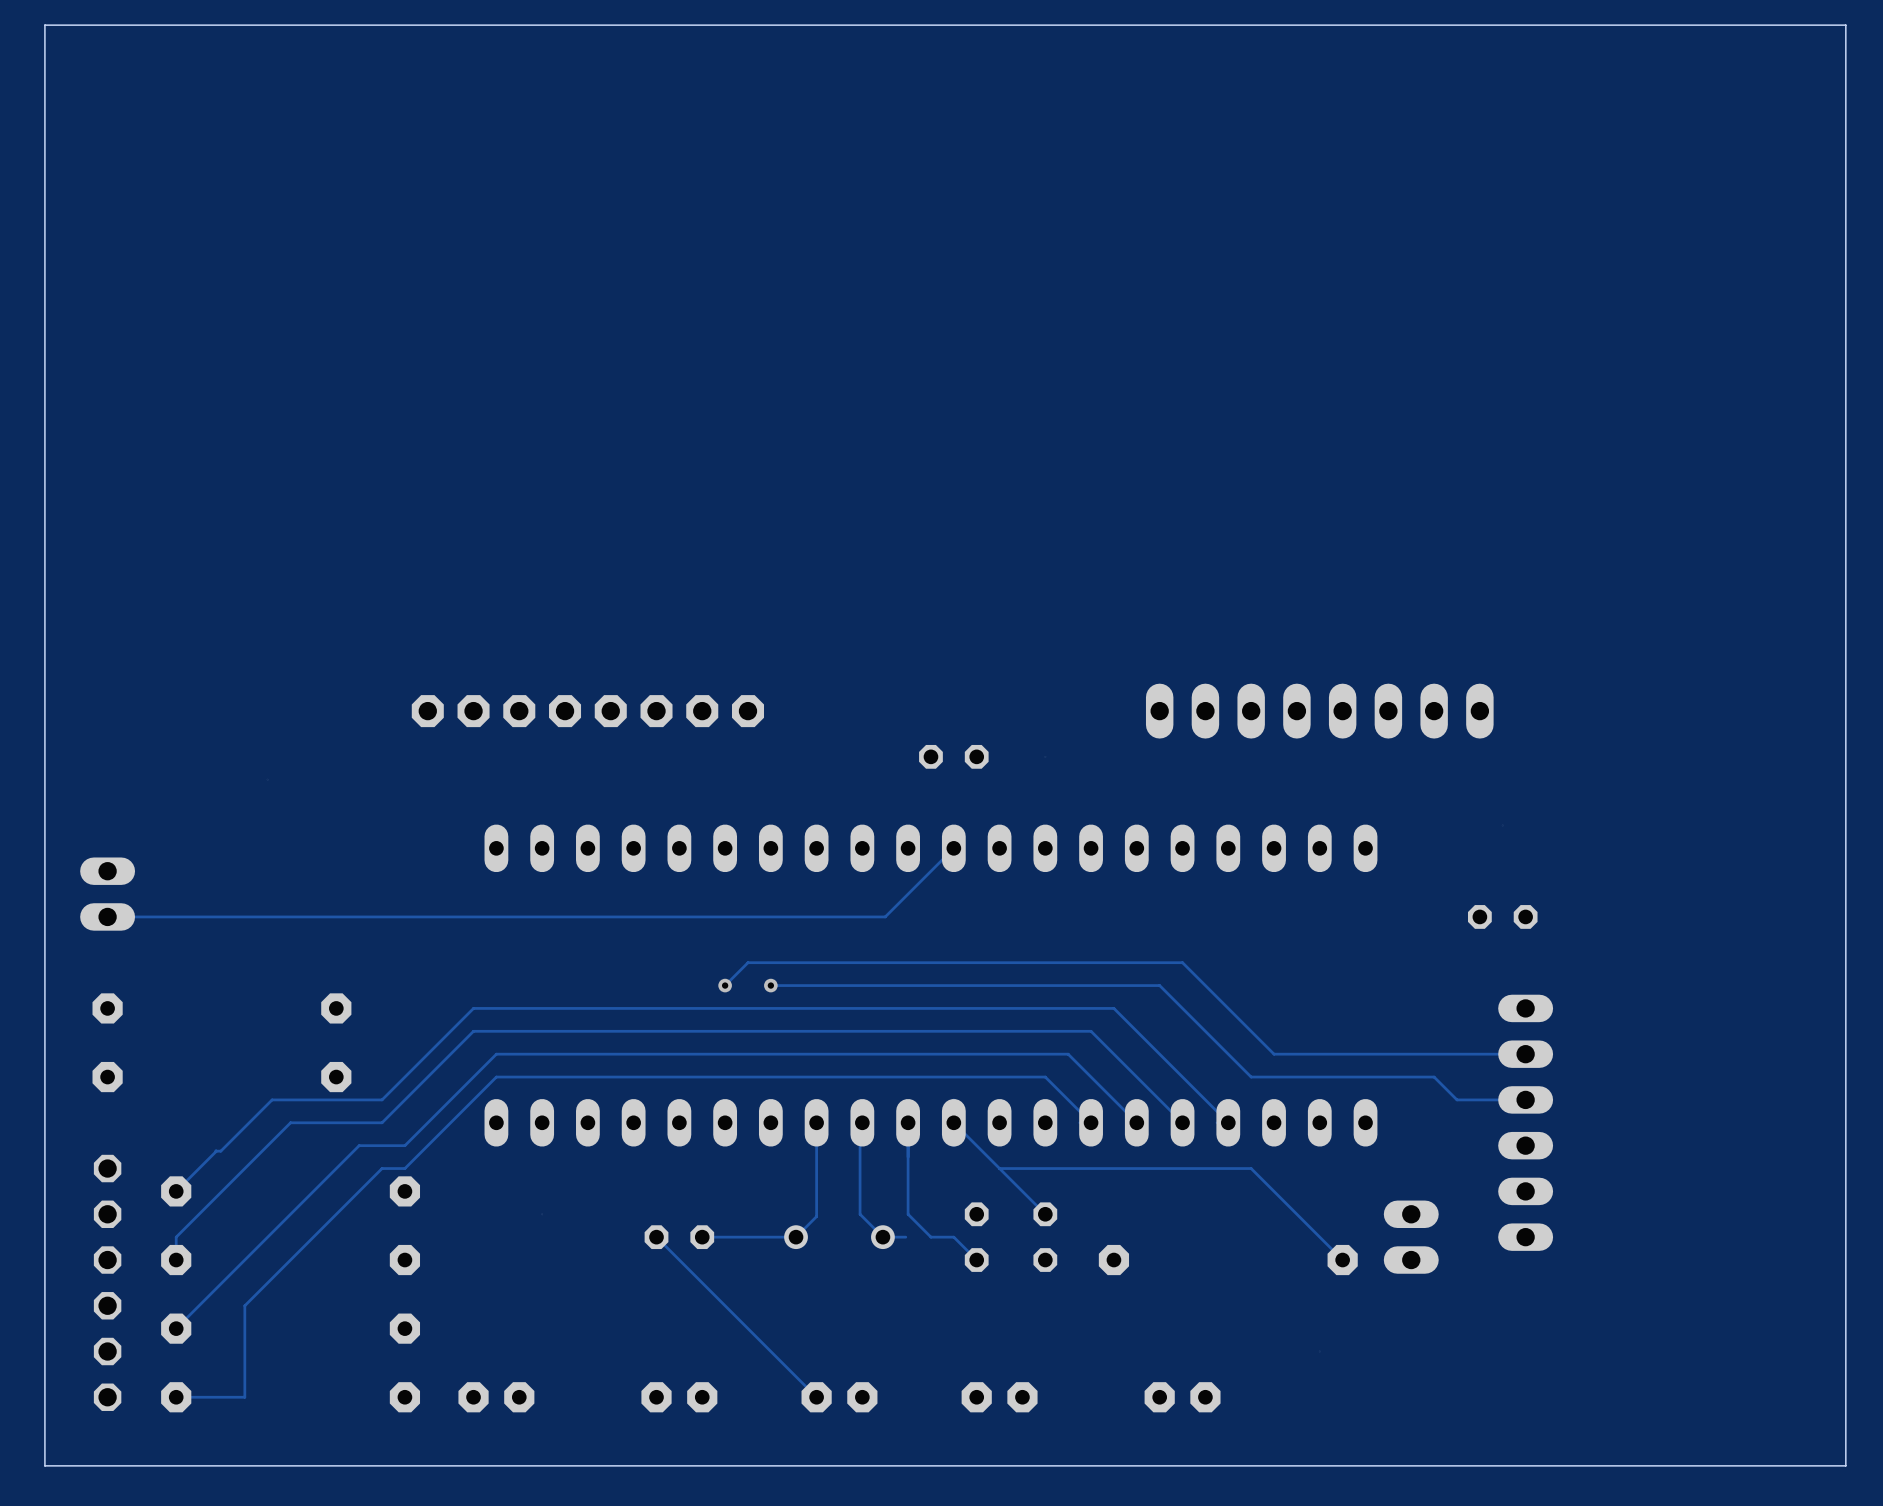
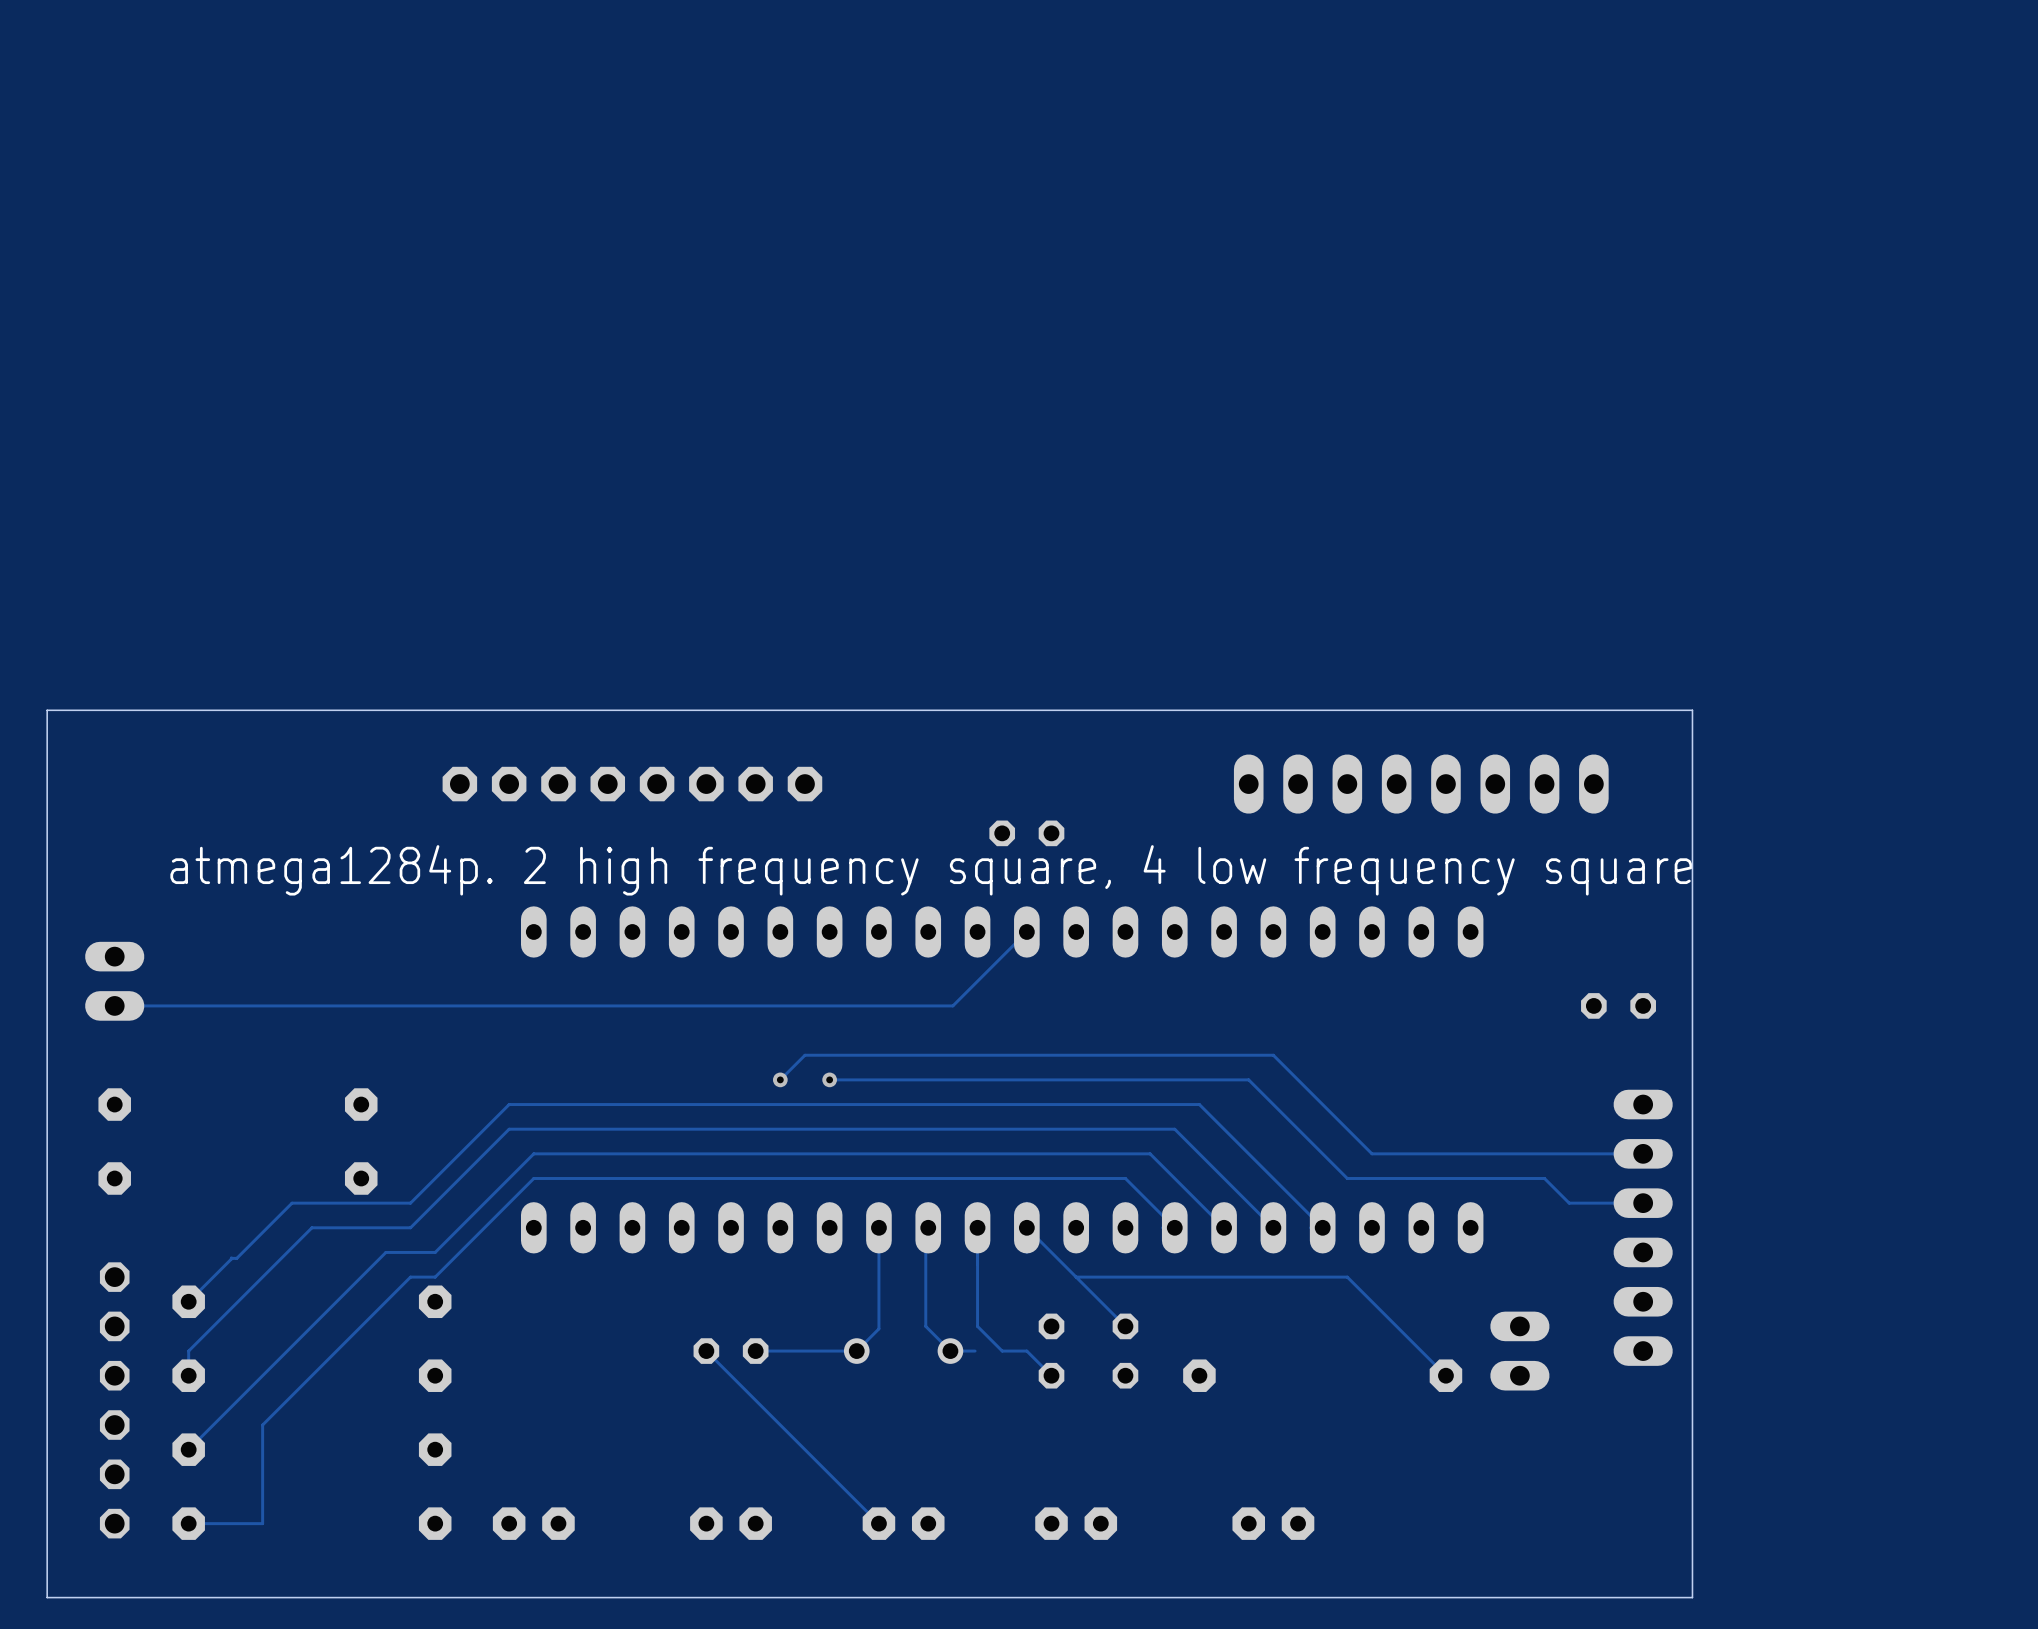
board edge: (44, 642) (44, 25) (1845, 25) (1845, 1465) (1571, 1465) -> (47, 710) (1692, 710) (1692, 1597)
text: none -> atmega1284p. 2 high frequency square, 4 low frequency square (931, 870)

